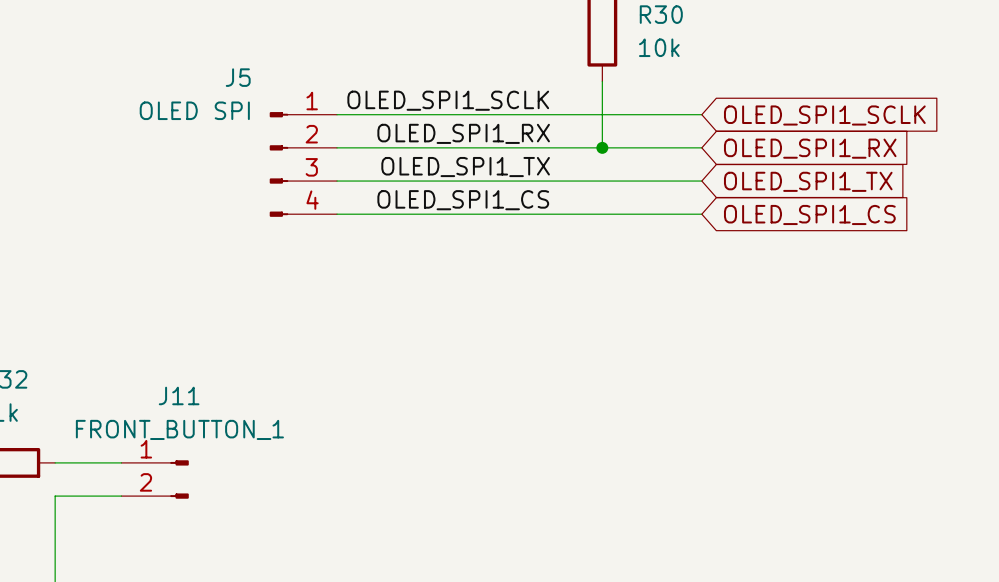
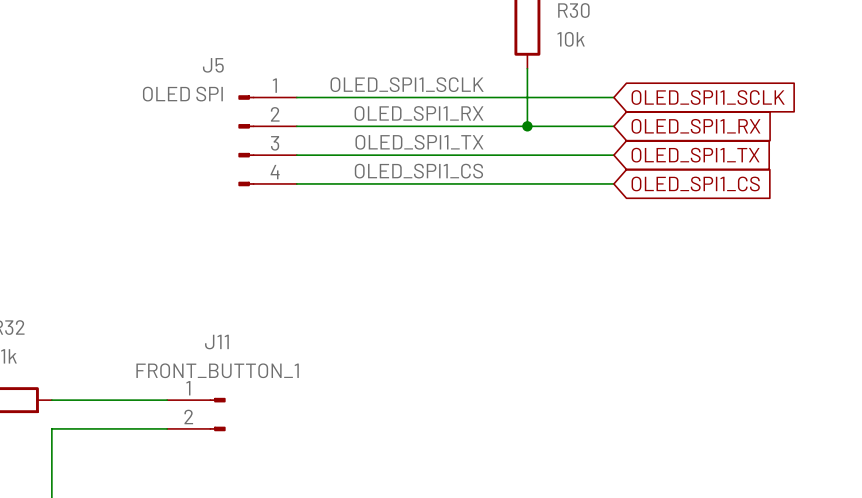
J11 position: (155, 479) -> (196, 414)

